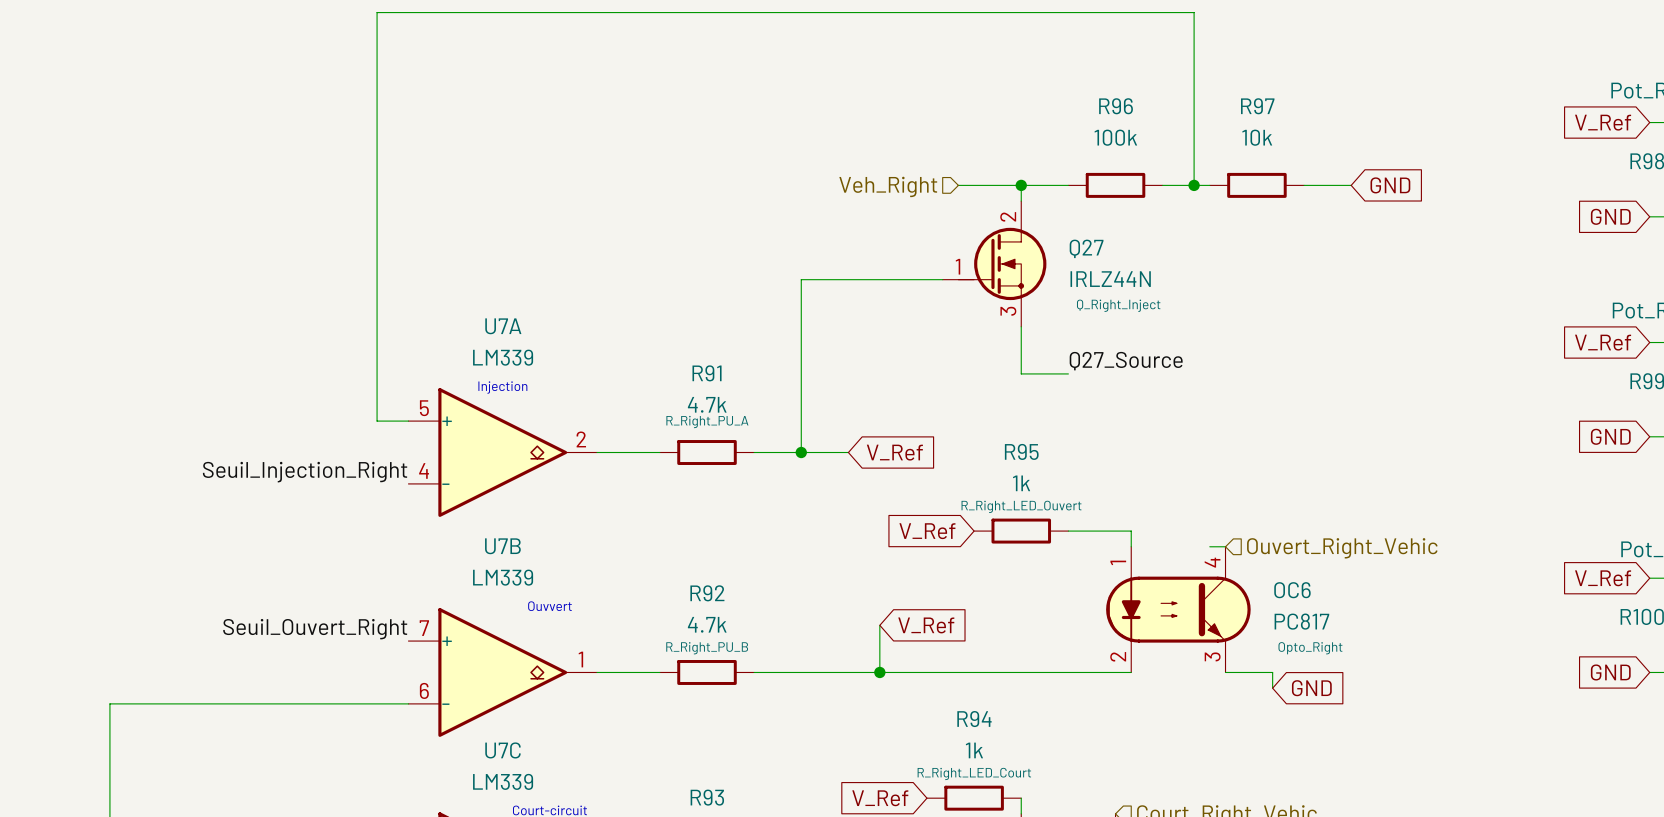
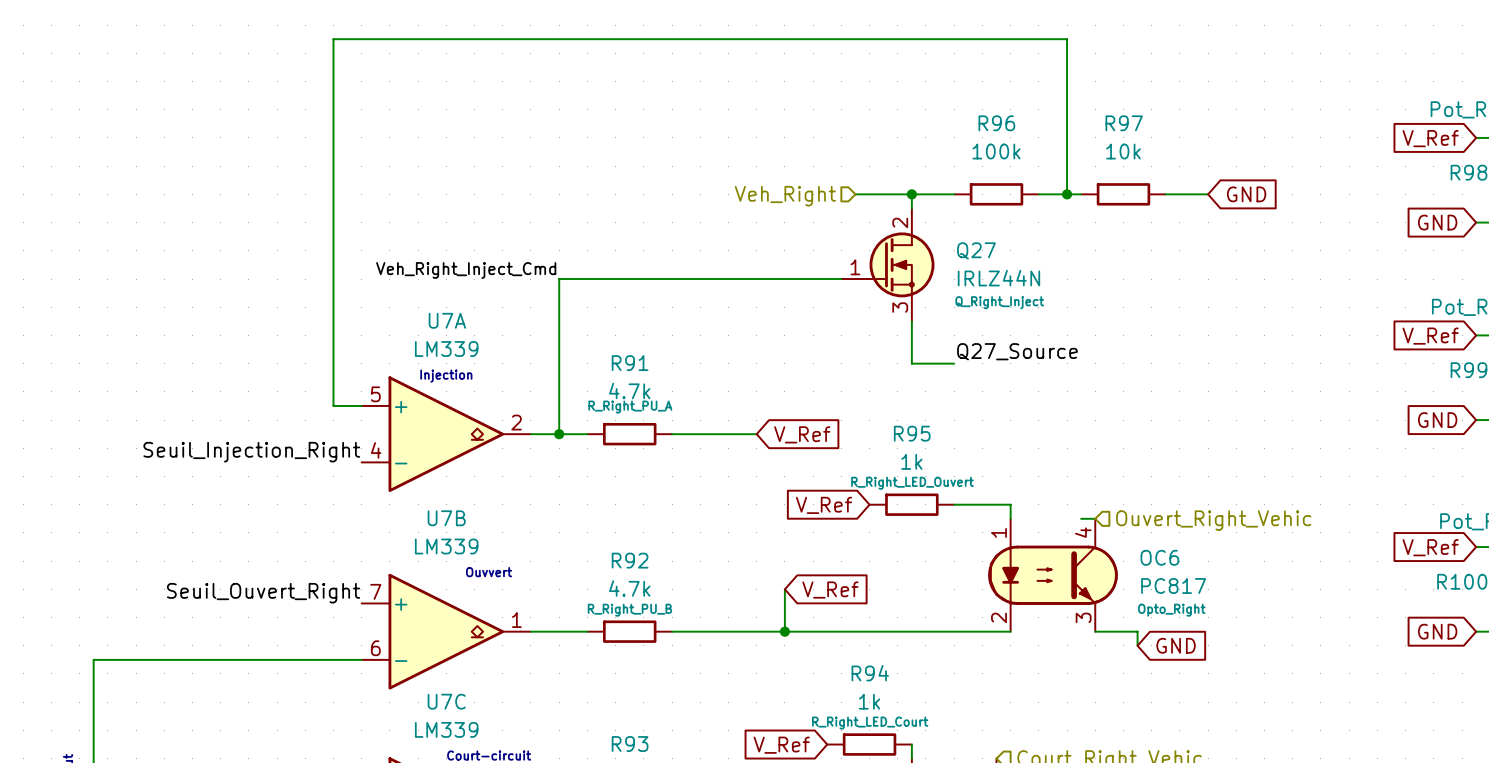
label: none -> Veh_Right_Inject_Cmd (466, 270)
wire: (801, 279) (801, 452) -> (714, 279) (559, 279) (559, 434)
junction: none -> (559, 434)
junction: (801, 452) -> none

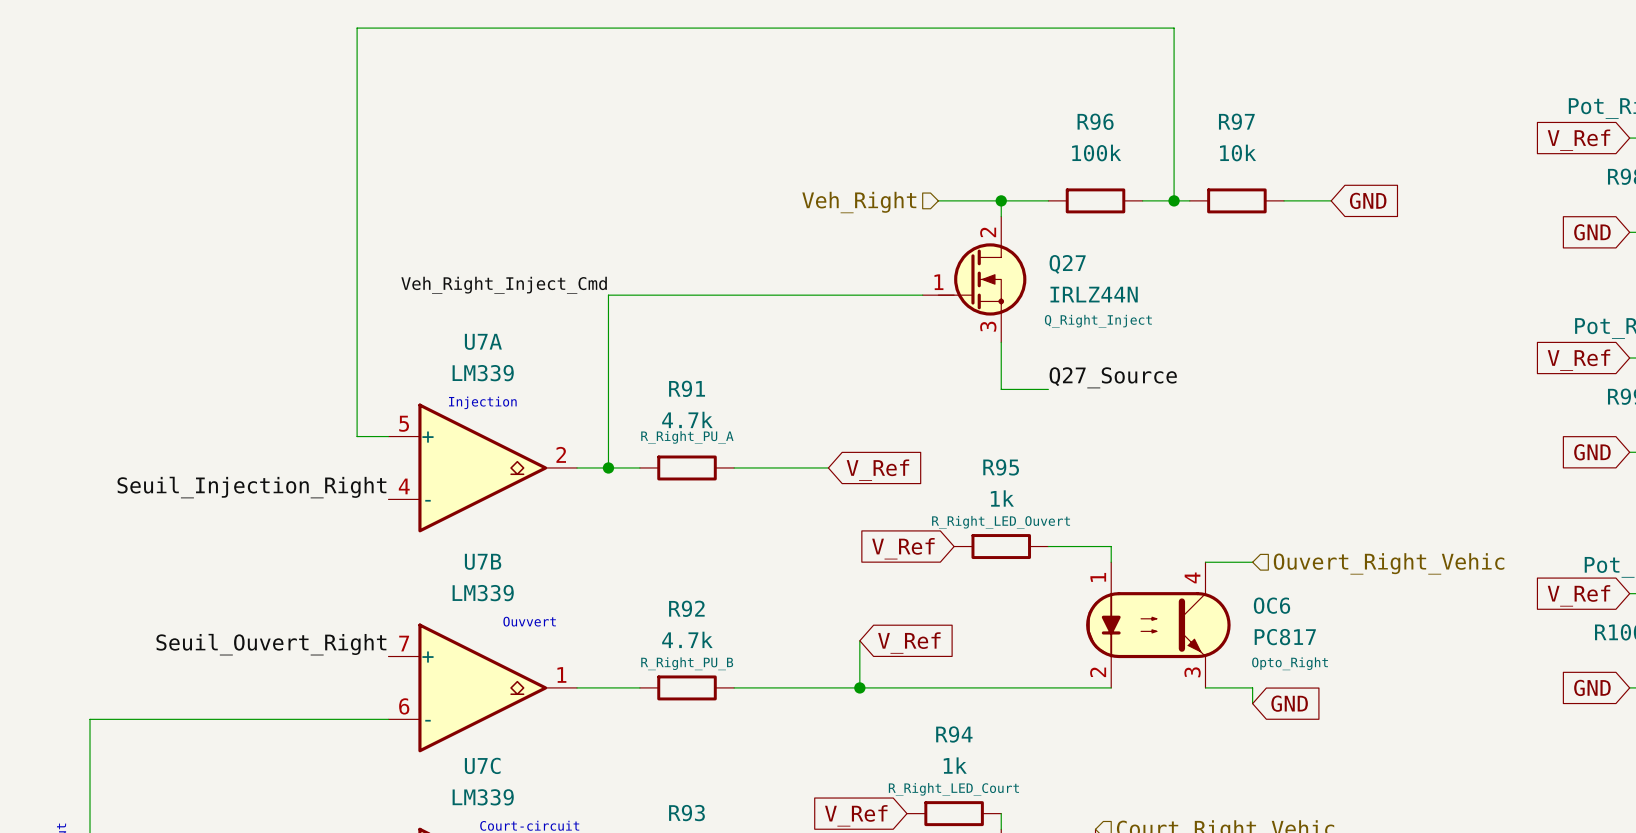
wire: (1081, 518) (1095, 518) -> (1252, 562) (1205, 562)
hierarchical label position: Ouvert_Right_Vehic (1213, 520) -> Ouvert_Right_Vehic (1389, 563)

